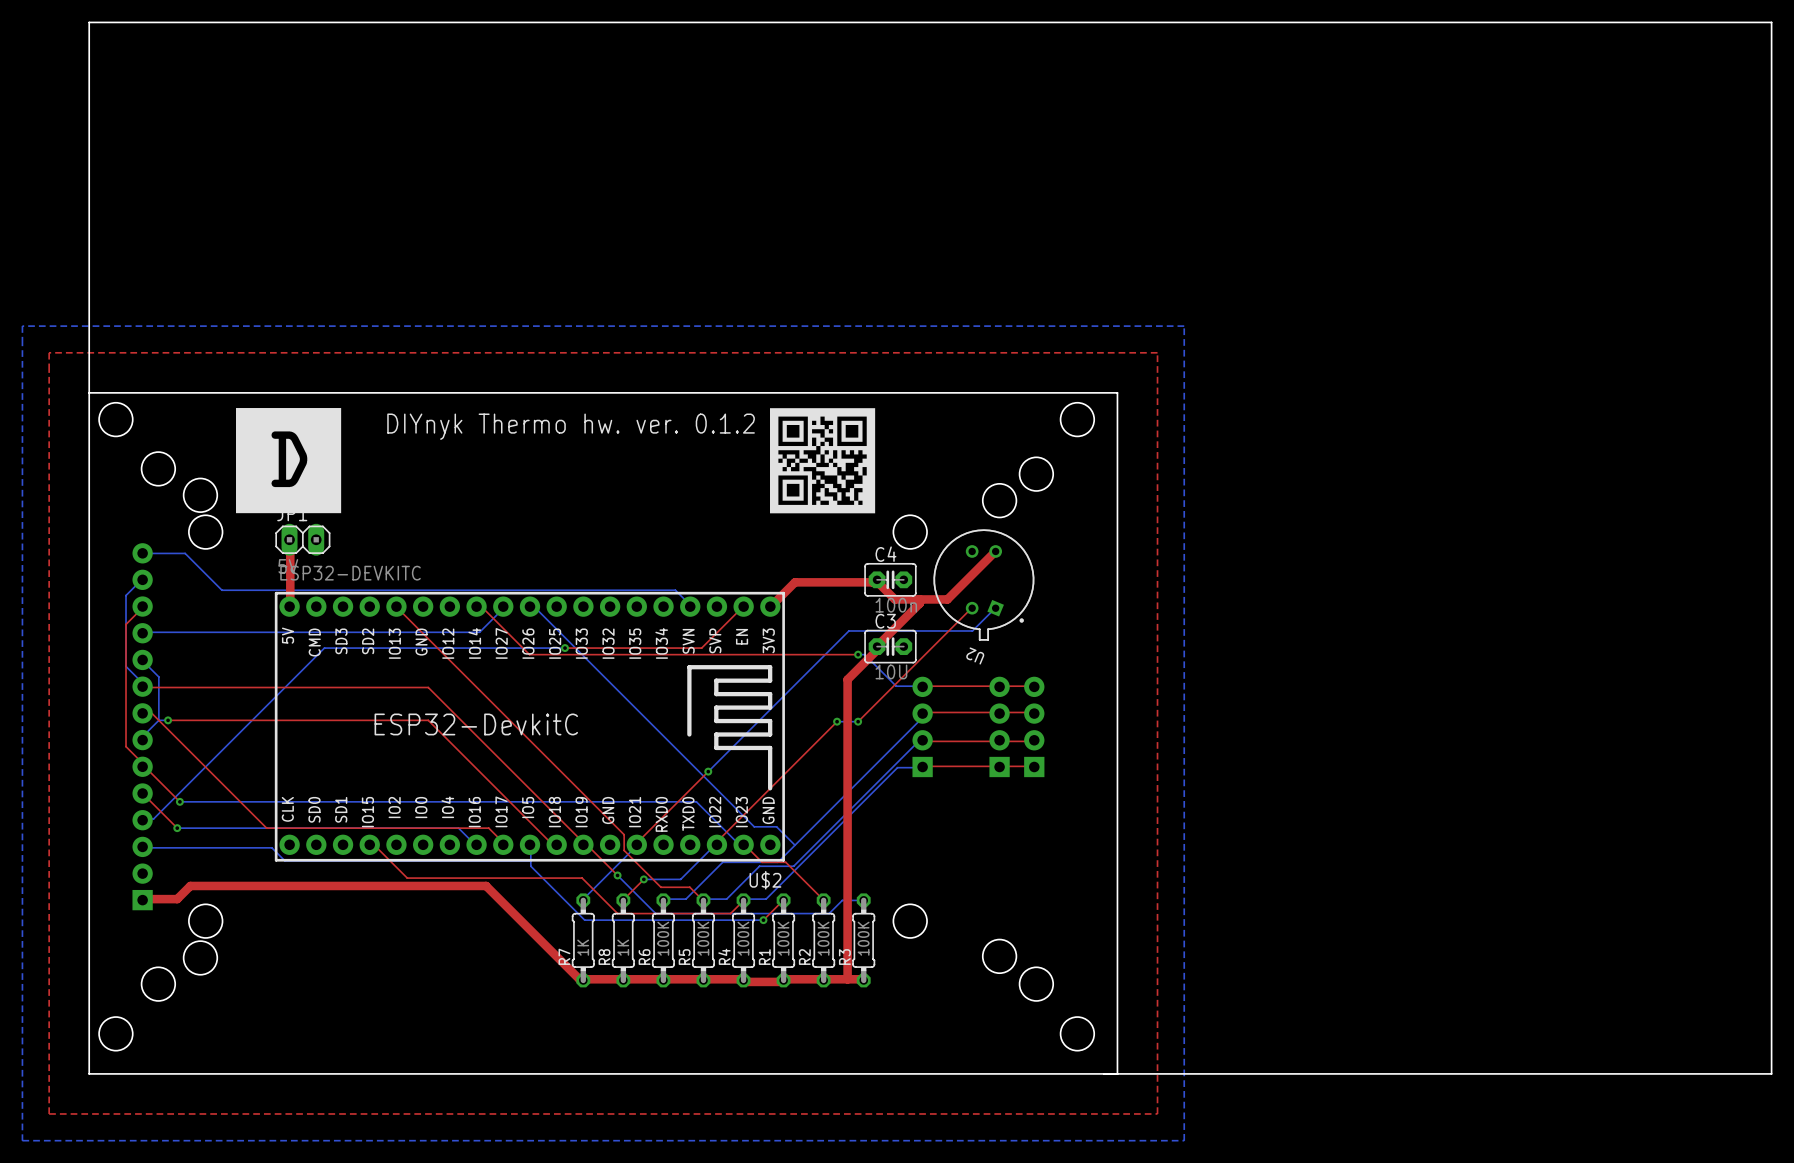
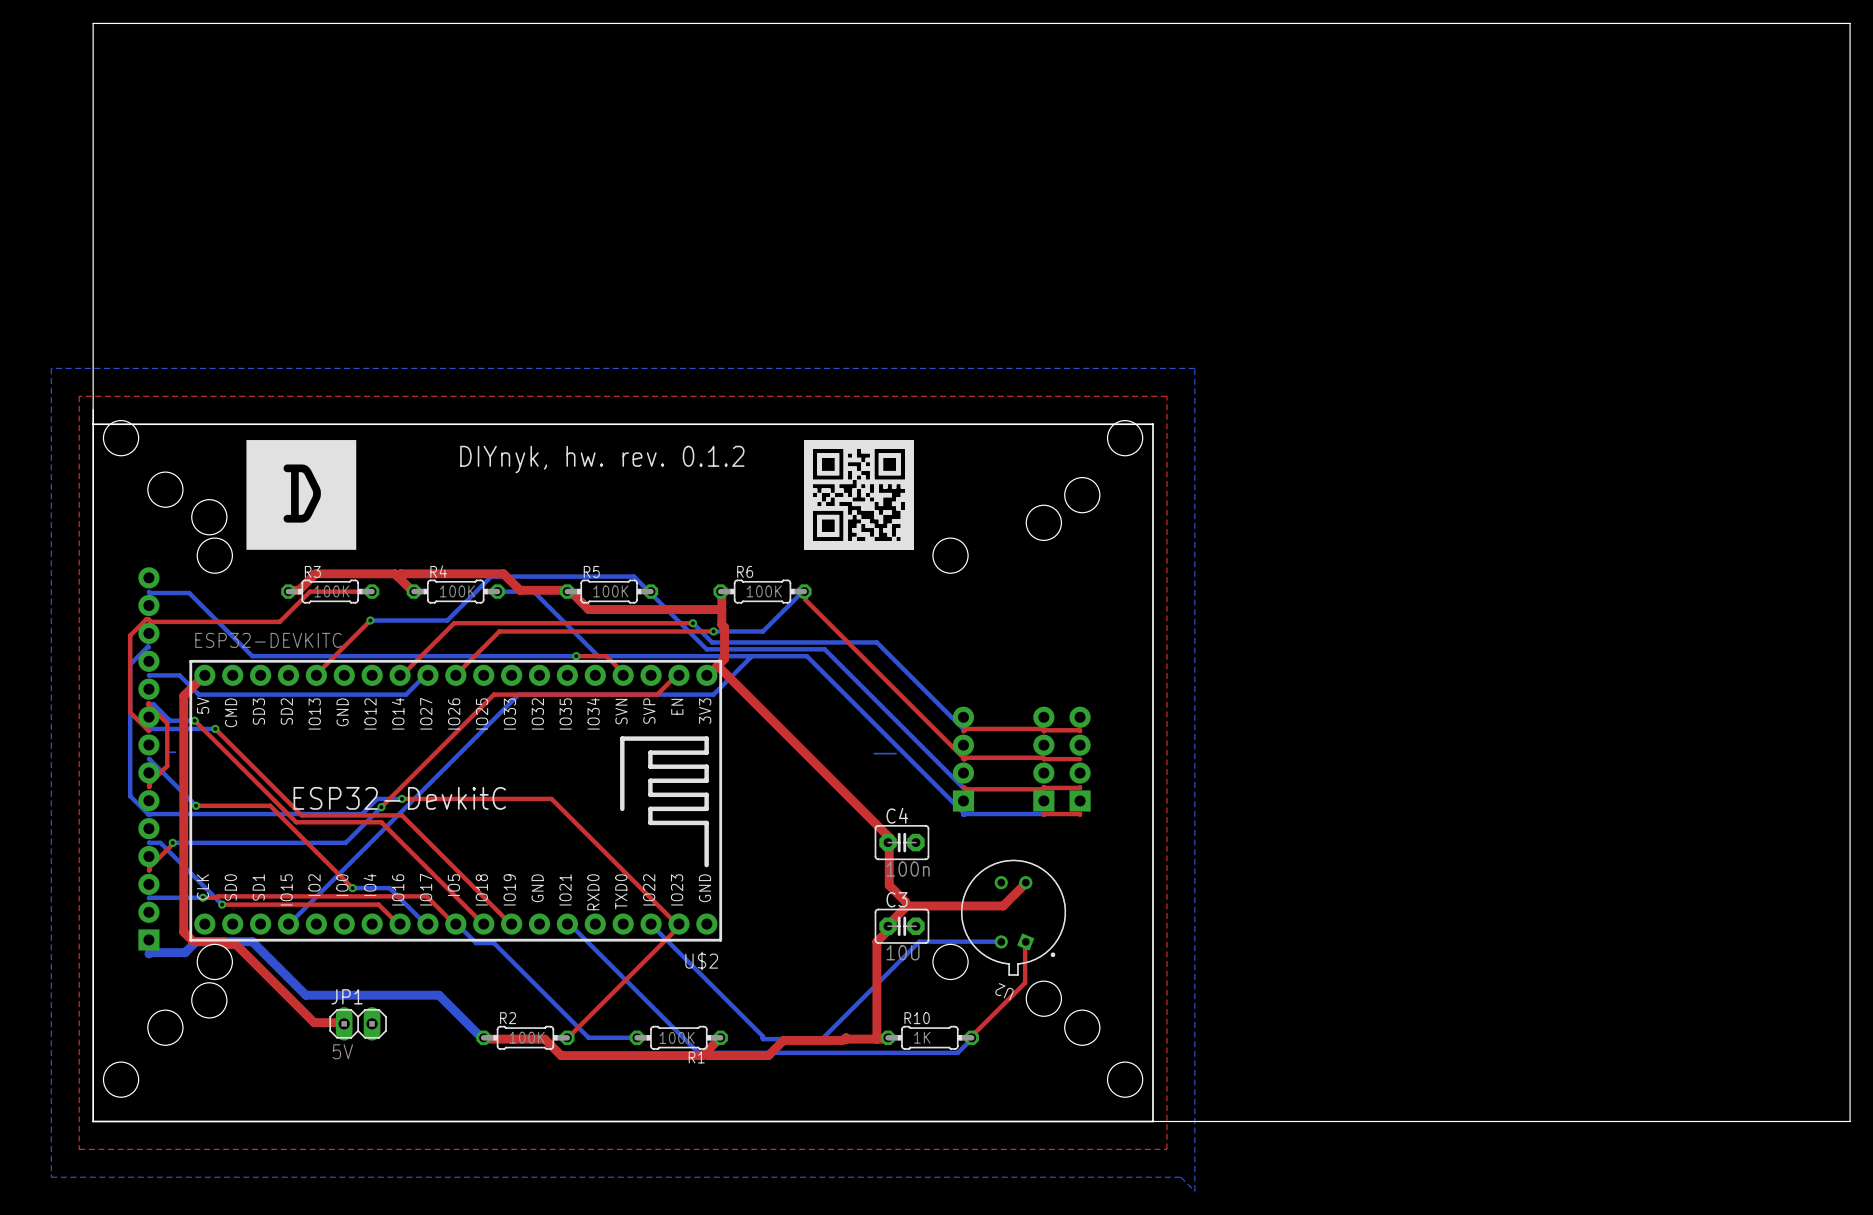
bottom zone outline: (22, 326) (22, 1140) (1184, 1140) (1184, 326) (22, 326) -> (51, 368) (51, 1177) (1180, 1177) (1194, 1191) (1194, 368) (51, 368)
top zone outline: (49, 352) (49, 1113) (1157, 1113) (1157, 352) (49, 352) -> (79, 396) (79, 1149) (1166, 1149) (1166, 396) (79, 396)
board edge: (89, 392) (1117, 392) (1117, 1073) (1104, 1073) -> (93, 424) (1153, 424) (1153, 1121)
text: DIYnyk Thermo hw. ver. 0.1.2 (571, 426) -> DIYnyk, hw. rev. 0.1.2 (602, 459)
drawing position: (288, 460) -> (301, 494)
drawing position: (822, 460) -> (858, 495)
top track: (289, 539) (289, 606) -> none
JP1 position: (302, 539) -> (358, 1023)
top track: (995, 551) (947, 599) (894, 599) (877, 579) (872, 582) (795, 582) (770, 606) -> none
top track: none -> (397, 576) (400, 573) (503, 573) (520, 590) (570, 591) (588, 609) (721, 609)
bottom track: (142, 553) (185, 553) (221, 590) (675, 590) (690, 606) -> none
bottom track: none -> (148, 591) (189, 593) (252, 656) (576, 656)
top track: none -> (288, 591) (299, 590) (315, 573) (395, 573) (413, 591)
top track: none -> (372, 591) (310, 591) (279, 621) (150, 621) (146, 619) (130, 635) (130, 712) (148, 731)
bottom track: none -> (497, 591) (533, 591) (598, 656) (806, 656) (964, 814) (963, 814) (1043, 814)
top track: none -> (720, 591) (721, 624) (724, 627) (724, 658) (706, 675)
top track: none -> (804, 591) (805, 599) (963, 759) (1080, 759)
bottom track: none -> (804, 591) (762, 631) (713, 631)
bottom track: (142, 579) (126, 595) (126, 666) (141, 682) (142, 686) -> none
C4 position: (890, 579) -> (901, 842)
U2 position: (983, 584) -> (1013, 917)
top track: none -> (370, 620) (316, 675)
bottom track: none -> (370, 620) (447, 620) (491, 576) (633, 576) (649, 591) (651, 591) (651, 594) (706, 649) (824, 649) (963, 787)
via: none -> (370, 620)
top track: none -> (692, 623) (454, 623) (400, 675)
bottom track: none -> (692, 623) (712, 642) (876, 642) (964, 730) (963, 731)
via: none -> (692, 623)
top track: (919, 599) (919, 603) (877, 645) (876, 650) (847, 679) (847, 979) -> none
top track: none -> (713, 631) (499, 631) (455, 675)
via: none -> (713, 631)
top track: (142, 606) (126, 624) (126, 746) (141, 762) (141, 766) (142, 766) (141, 763) (179, 801) -> none
top track: (396, 606) (624, 834) (624, 850) (660, 887) (689, 887) (703, 900) -> none
top track: (476, 606) (482, 607) (529, 654) (858, 654) -> none
bottom track: (503, 606) (479, 632) (142, 633) -> none
bottom track: (529, 606) (534, 607) (754, 826) (776, 826) (795, 845) -> none
top track: (743, 606) (701, 648) (565, 648) -> none
top track: (972, 608) (858, 721) -> none
bottom track: (995, 608) (972, 630) (848, 630) (708, 771) -> none
bottom track: none -> (148, 647) (130, 664) (130, 796) (148, 814) (362, 814) (377, 798) (401, 798)
top track: none -> (576, 656) (606, 656) (624, 674) (623, 675)
bottom track: none -> (750, 656) (713, 694) (518, 694) (288, 924)
top track: none -> (717, 665) (890, 838) (888, 842) (889, 885) (905, 901) (907, 905)
bottom track: none -> (148, 675) (179, 675) (198, 694) (406, 694) (426, 674) (427, 675)
top track: none -> (204, 675) (183, 695) (183, 932) (193, 941) (223, 941) (226, 944) (235, 944) (314, 1022) (344, 1023)
top track: none -> (678, 675) (677, 674) (657, 694) (493, 694) (381, 807)
C3 position: (890, 646) -> (901, 926)
bottom track: (565, 648) (324, 648) (153, 818) (142, 820) -> none
via position: (565, 648) -> (576, 656)
bottom track: (858, 654) (864, 654) (896, 686) (922, 686) -> none
via: (858, 654) -> none
bottom track: (142, 659) (158, 676) (158, 720) (143, 736) (142, 740) -> none
top track: none -> (148, 703) (167, 723) (167, 765) (149, 783) (148, 786)
bottom track: none -> (148, 703) (153, 704) (170, 720) (194, 720)
top track: (142, 686) (428, 687) (586, 845) (583, 844) (583, 845) (587, 845) (617, 875) -> none
top track: (922, 686) (1034, 686) -> none
top track: none -> (194, 720) (296, 822) (381, 822) (483, 924)
via: none -> (194, 720)
top track: none -> (215, 728) (301, 815) (401, 815) (511, 924)
bottom track: none -> (215, 728) (150, 728) (148, 731)
via: none -> (215, 728)
top track: none -> (963, 731) (966, 728) (1042, 728) (1043, 731) (1080, 731)
top track: (142, 713) (152, 713) (266, 828) (488, 828) (504, 843) (503, 844) -> none
top track: (922, 713) (1034, 713) -> none
bottom track: (922, 713) (922, 717) (777, 862) (722, 862) (685, 899) (663, 900) -> none
top track: (168, 720) (428, 720) (551, 843) (556, 844) -> none
via: (168, 720) -> none
top track: (837, 721) (717, 841) (716, 844) -> none
via: (837, 721) -> none
via: (858, 721) -> none
bottom track: none -> (148, 758) (196, 805)
U$2 position: (529, 726) -> (455, 800)
top track: (922, 740) (1034, 740) -> none
bottom track: (922, 740) (918, 741) (793, 866) (759, 866) (726, 899) (703, 900) -> none
top track: none -> (963, 787) (966, 789) (1042, 789) (1043, 787) (1080, 787)
top track: none -> (401, 798) (551, 798) (676, 923) (678, 924) (677, 927) (567, 1037)
via: none -> (401, 798)
top track: (922, 766) (1034, 766) -> none
bottom track: (922, 766) (897, 767) (766, 899) (743, 900) -> none
top track: none -> (196, 805) (270, 805) (352, 888)
via: none -> (196, 805)
top track: (708, 771) (636, 844) -> none
via: (708, 771) -> none
bottom track: none -> (381, 807) (345, 842) (172, 842)
via: none -> (381, 807)
top track: none -> (1043, 814) (1080, 814)
top track: (142, 793) (177, 828) -> none
bottom track: (179, 801) (696, 801) (738, 843) (743, 844) -> none
via: (179, 801) -> none
bottom track: none -> (148, 842) (160, 842) (222, 904)
top track: none -> (172, 842) (149, 867) (148, 870)
via: none -> (172, 842)
bottom track: (177, 828) (458, 828) (476, 844) -> none
via: (177, 828) -> none
top track: (369, 844) (374, 845) (407, 878) (582, 878) (617, 913) (730, 913) (743, 900) -> none
bottom track: (529, 844) (530, 866) (584, 920) (763, 920) -> none
bottom track: (636, 844) (583, 900) -> none
bottom track: (716, 844) (680, 879) (643, 879) -> none
top track: (743, 844) (762, 862) (785, 862) (823, 900) -> none
top track: none -> (1025, 882) (1003, 905) (907, 905)
bottom track: (142, 846) (271, 847) (285, 861) (530, 861) -> none
bottom track: none -> (352, 888) (389, 888) (426, 925) (427, 924)
via: none -> (352, 888)
top track: none -> (202, 897) (426, 896) (455, 924)
bottom track: none -> (202, 897) (148, 898)
via: none -> (202, 897)
top track: none -> (222, 904) (378, 904) (400, 924)
via: none -> (222, 904)
top track: none -> (907, 905) (887, 925) (887, 930) (876, 941) (876, 1039)
bottom track: (617, 875) (655, 913) (829, 913) (842, 900) (863, 900) -> none
via: (617, 875) -> none
top track: (643, 879) (623, 900) -> none
via: (643, 879) -> none
bottom track: none -> (455, 924) (476, 943) (493, 943) (588, 1037) (637, 1037)
bottom track: none -> (567, 924) (570, 925) (698, 1052) (957, 1052) (971, 1037)
bottom track: none -> (651, 924) (762, 1036) (762, 1039) (821, 1039) (919, 941) (1001, 941)
top track: (142, 900) (177, 899) (190, 885) (486, 885) (579, 979) (583, 980) (863, 980) -> none
top track: (783, 900) (763, 920) -> none
top track: none -> (1025, 941) (1025, 982) (971, 1037)
bottom track: none -> (148, 953) (185, 952) (196, 941) (252, 941) (305, 995) (439, 995) (483, 1037)
via: (763, 920) -> none
R7: 1K (583, 940) -> none
R8: 1K (623, 940) -> none
R6 rotation: 0° (663, 940) -> 90° clockwise (762, 591)
R6 position: (663, 940) -> (762, 591)
R5 rotation: 0° (703, 940) -> 90° clockwise (609, 591)
R5 position: (703, 940) -> (609, 591)
R4 rotation: 0° (743, 940) -> 90° clockwise (455, 591)
R4 position: (743, 940) -> (455, 591)
R1 rotation: 0° (783, 940) -> 90° clockwise (678, 1037)
R1 position: (783, 940) -> (678, 1037)
R2 rotation: 0° (823, 940) -> 90° clockwise (525, 1037)
R2 position: (823, 940) -> (525, 1037)
R3 rotation: 0° (863, 940) -> 90° clockwise (330, 591)
R3 position: (863, 940) -> (330, 591)
R1 name position: R1 (764, 957) -> R1 (696, 1057)
top track: none -> (483, 1037) (544, 1039) (561, 1055) (702, 1055) (720, 1037)
top track: none -> (888, 1037) (846, 1037) (842, 1040) (783, 1040) (768, 1055) (708, 1055) (705, 1052)
R10: none -> 1K (929, 1037)

